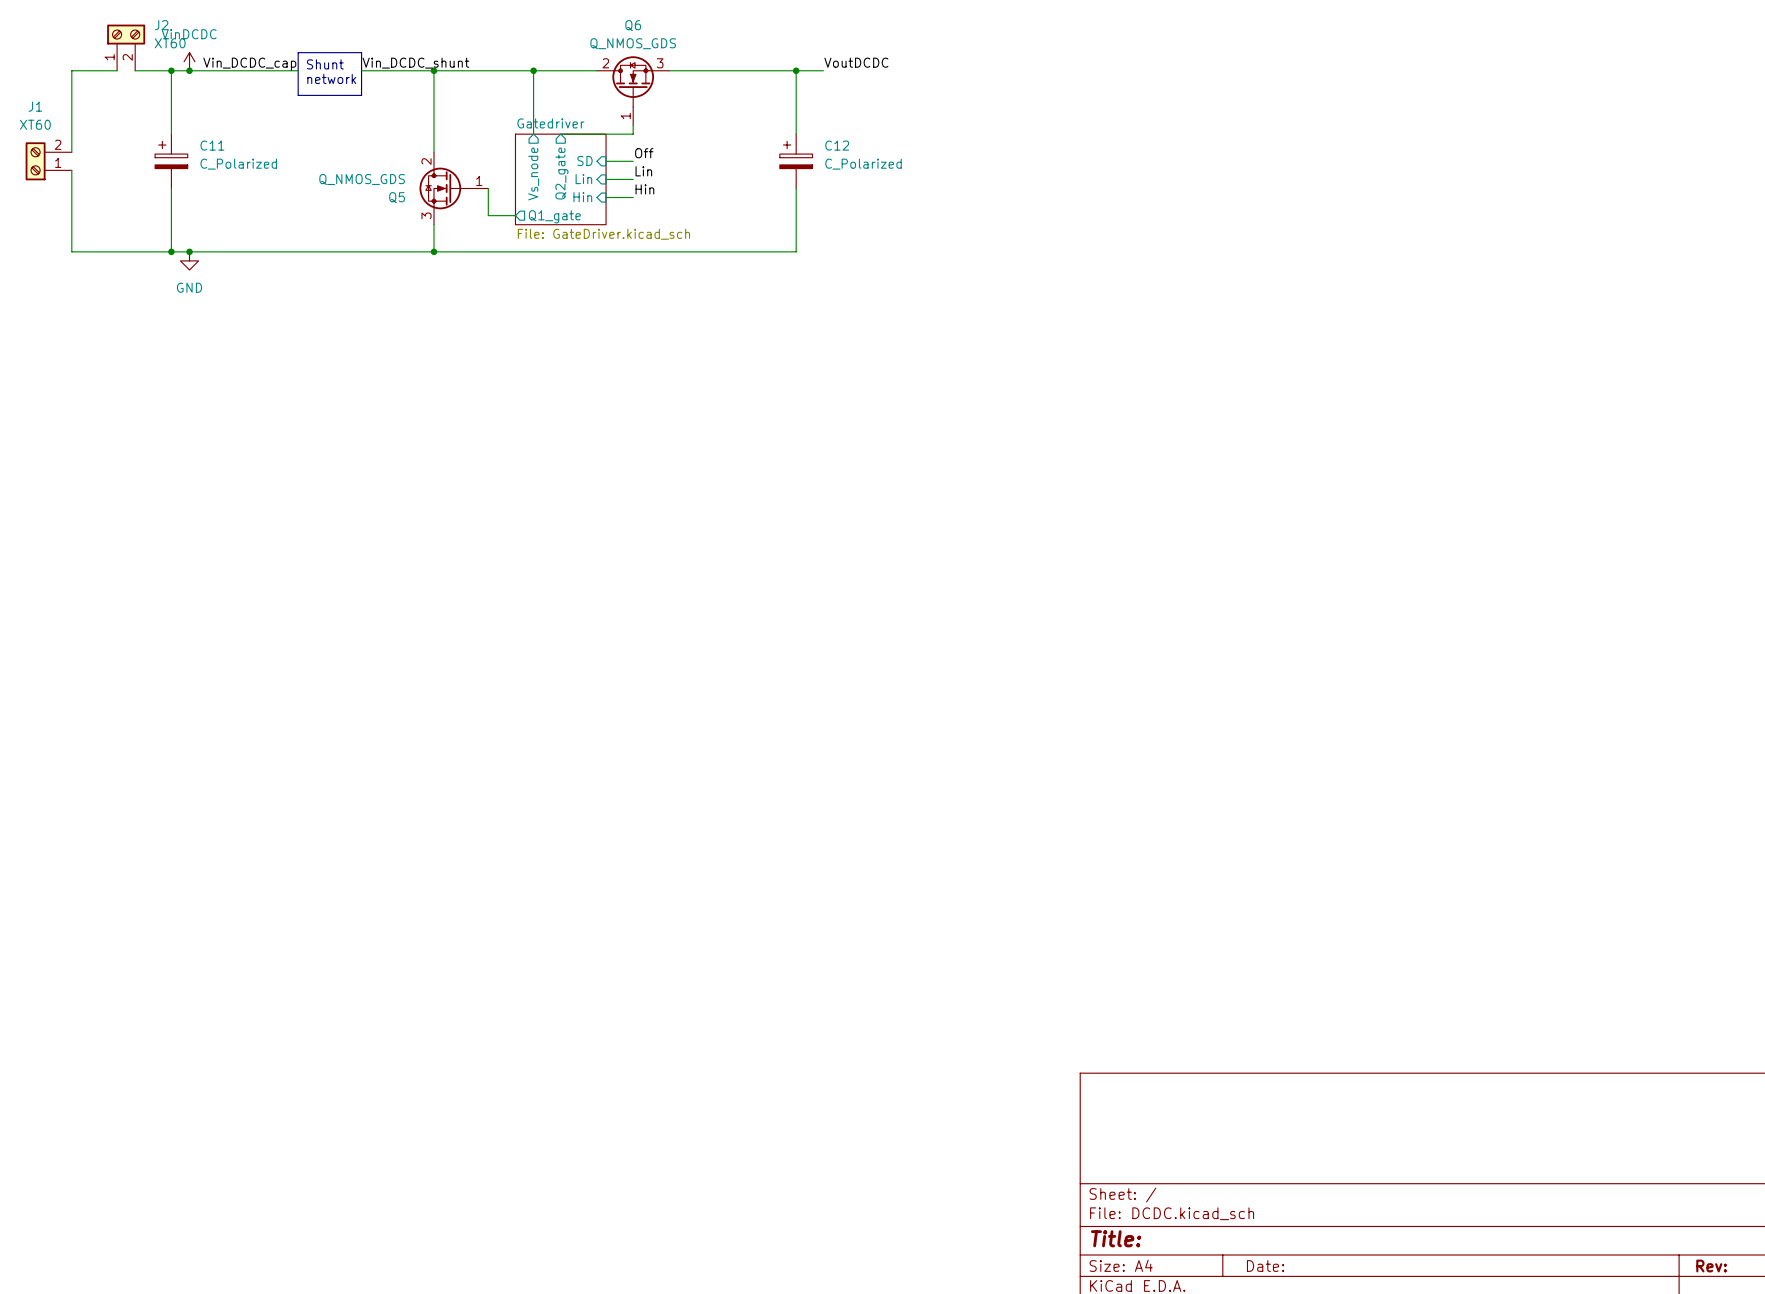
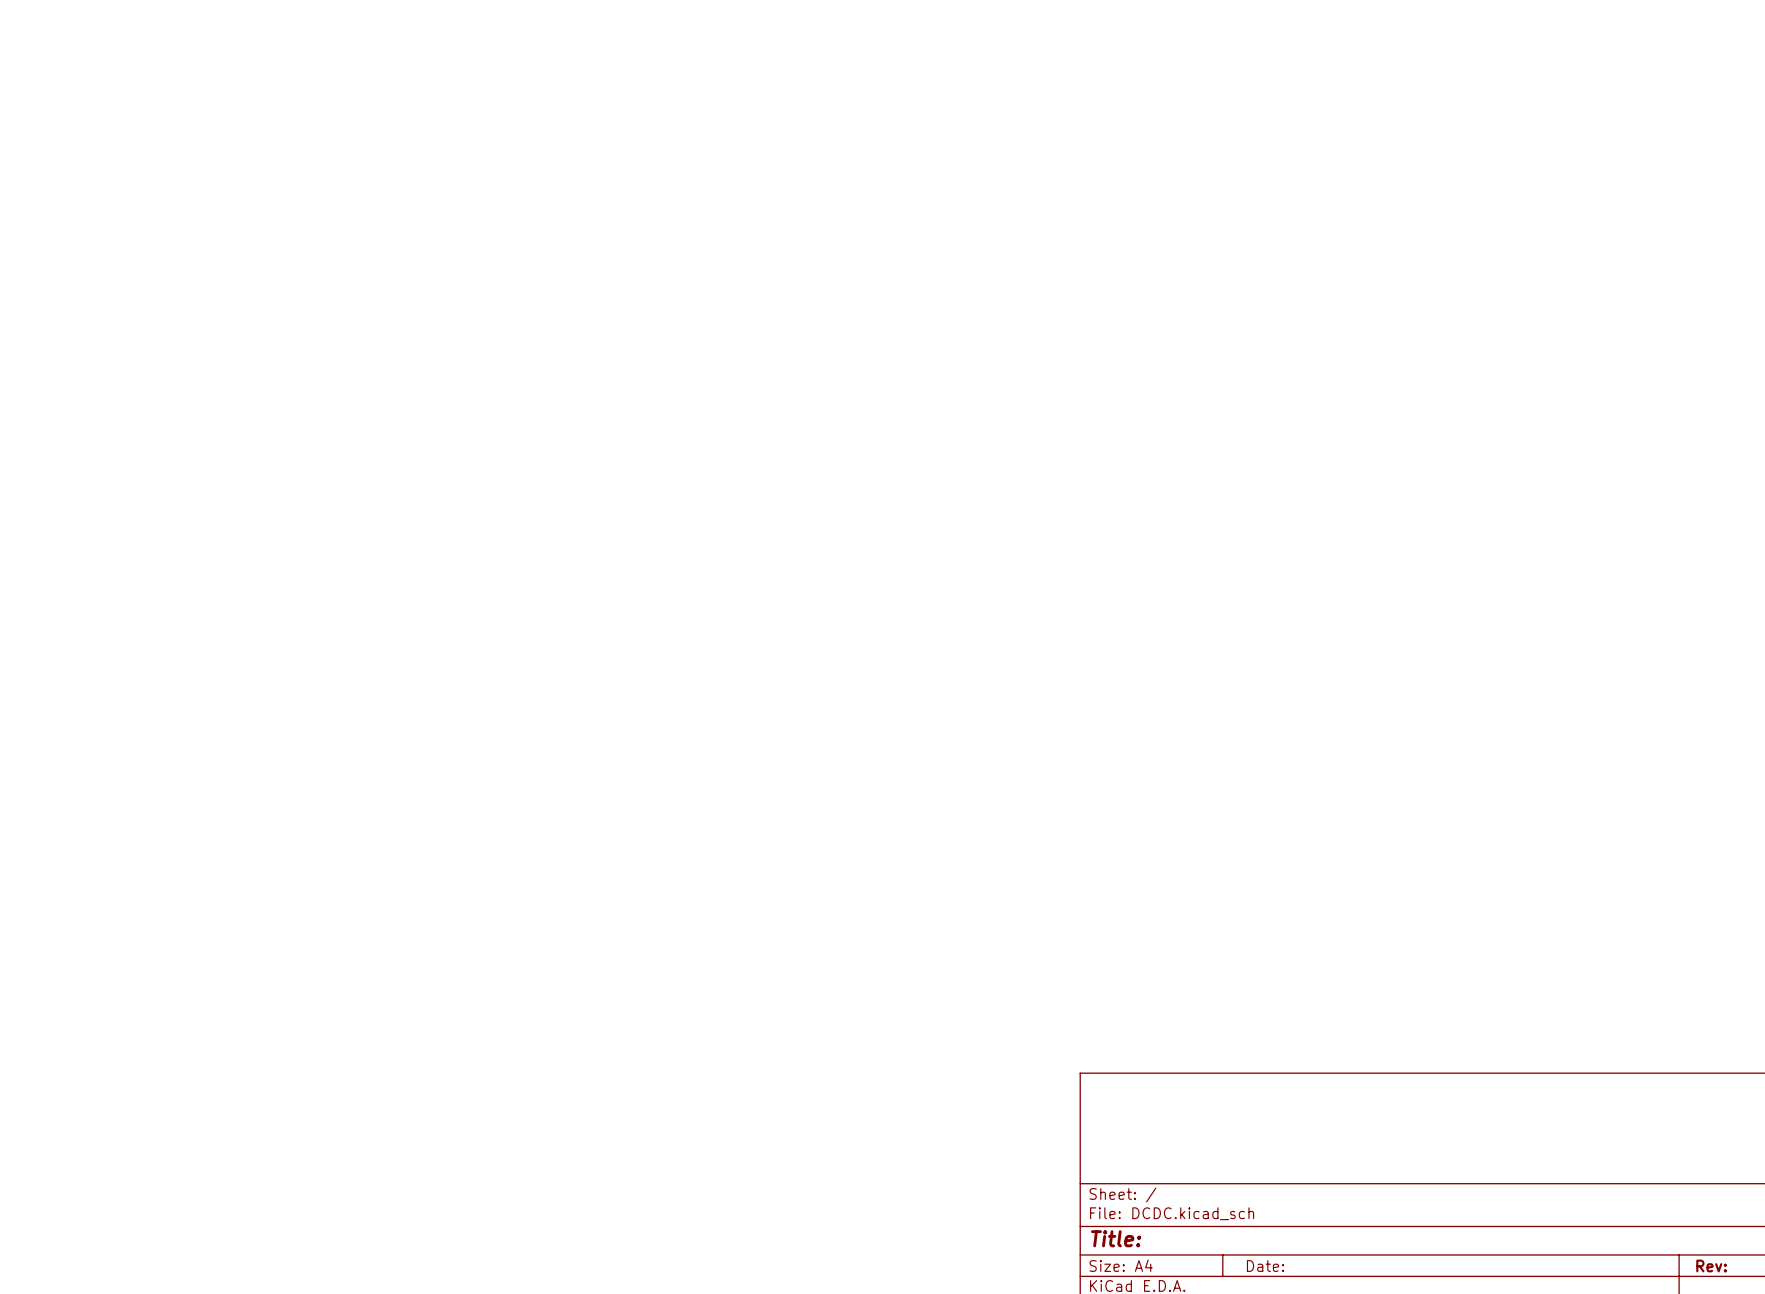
J2: XT60 (126, 47) -> none
line: (298, 52) (361, 52) (361, 95) (298, 95) (298, 52) -> none
power symbol: VinDCDC (189, 61) -> none
label: VoutDCDC (856, 62) -> none
label: Vin_DCDC_shunt (415, 63) -> none
label: Vin_DCDC_cap (249, 64) -> none
text: Shunt (325, 64) -> none
wire: (117, 70) (71, 70) (71, 152) -> none
wire: (135, 70) (298, 70) -> none
wire: (171, 70) (171, 134) -> none
junction: (171, 70) -> none
junction: (189, 70) -> none
wire: (361, 70) (596, 70) -> none
wire: (433, 70) (433, 152) -> none
junction: (433, 70) -> none
wire: (533, 70) (533, 134) -> none
junction: (533, 70) -> none
wire: (669, 70) (823, 70) -> none
wire: (796, 70) (796, 134) -> none
junction: (796, 70) -> none
text: network (331, 78) -> none
Q6: Q_NMOS_GDS (633, 90) -> none
wire: (633, 125) (633, 134) (560, 134) -> none
label: Off (644, 153) -> none
sheet pin: SD (584, 160) -> none
J1: XT60 (48, 161) -> none
C11: C_Polarized (171, 161) -> none
wire: (606, 161) (633, 161) -> none
C12: C_Polarized (796, 161) -> none
wire: (71, 170) (71, 251) (796, 251) (796, 188) -> none
label: Lin (643, 171) -> none
sheet pin: Vs_node (533, 173) -> none
sheet pin: Q2_gate (561, 173) -> none
sheet Gatedriver: File: GateDriver.kicad_sch (560, 179) -> none
sheet pin: Lin (583, 179) -> none
wire: (606, 179) (633, 179) -> none
wire: (171, 188) (171, 251) -> none
Q5: Q_NMOS_GDS (453, 188) -> none
wire: (488, 188) (488, 215) (515, 215) -> none
label: Hin (644, 189) -> none
sheet pin: Hin (582, 197) -> none
wire: (606, 197) (633, 197) -> none
sheet pin: Q1_gate (554, 216) -> none
wire: (433, 224) (433, 251) -> none
junction: (171, 251) -> none
junction: (189, 251) -> none
junction: (433, 251) -> none
power symbol: GND (189, 260) -> none

